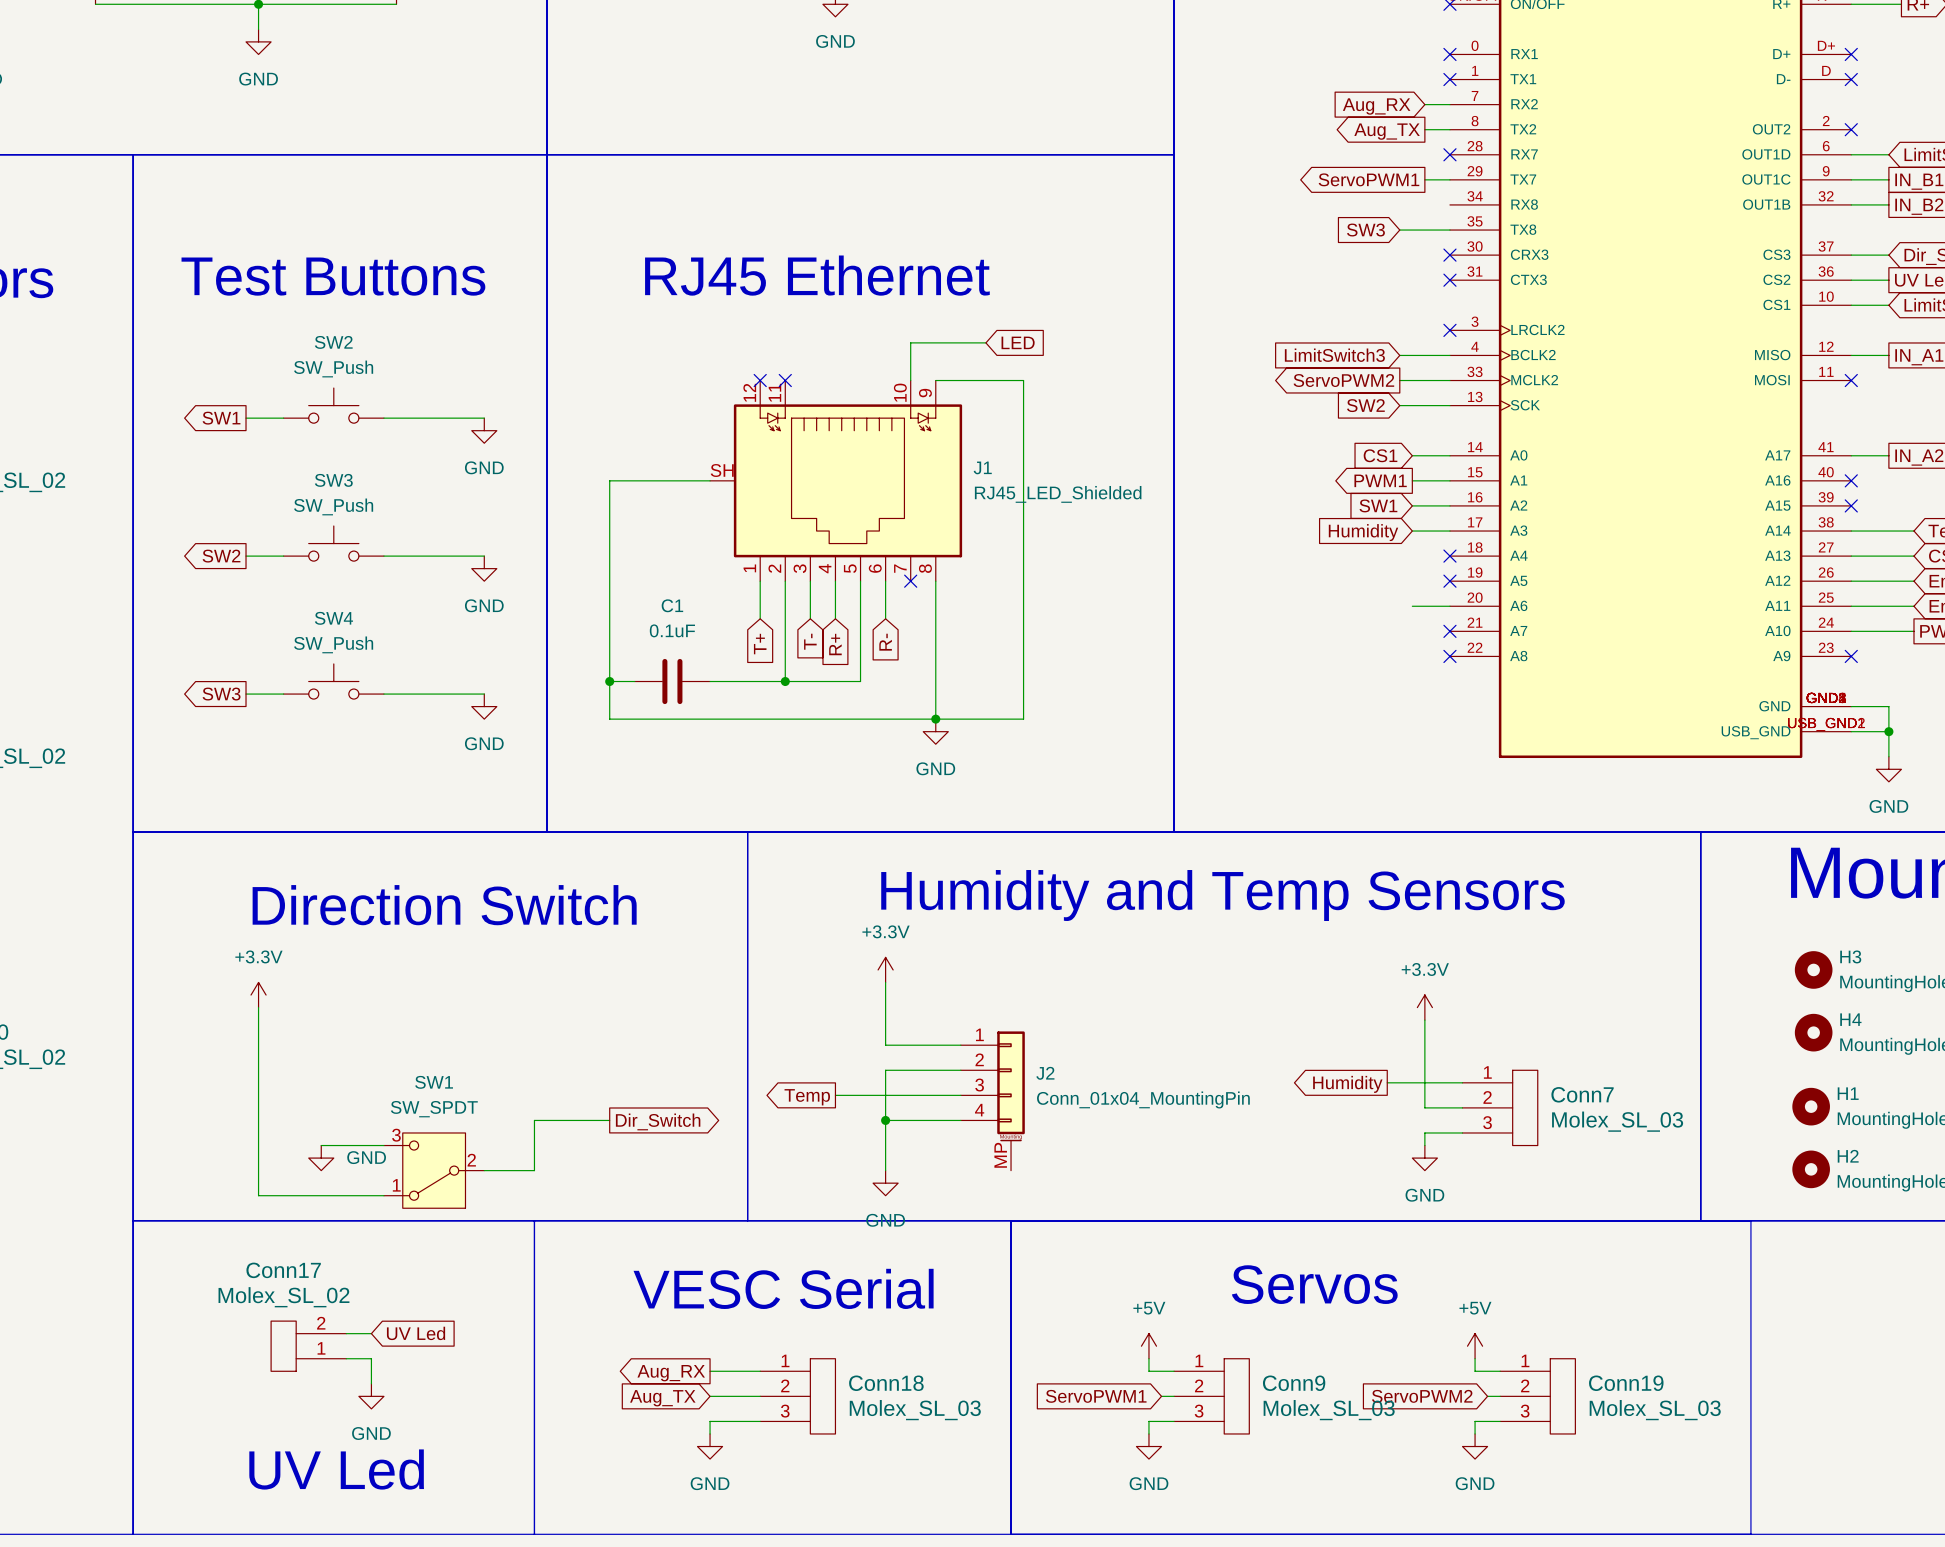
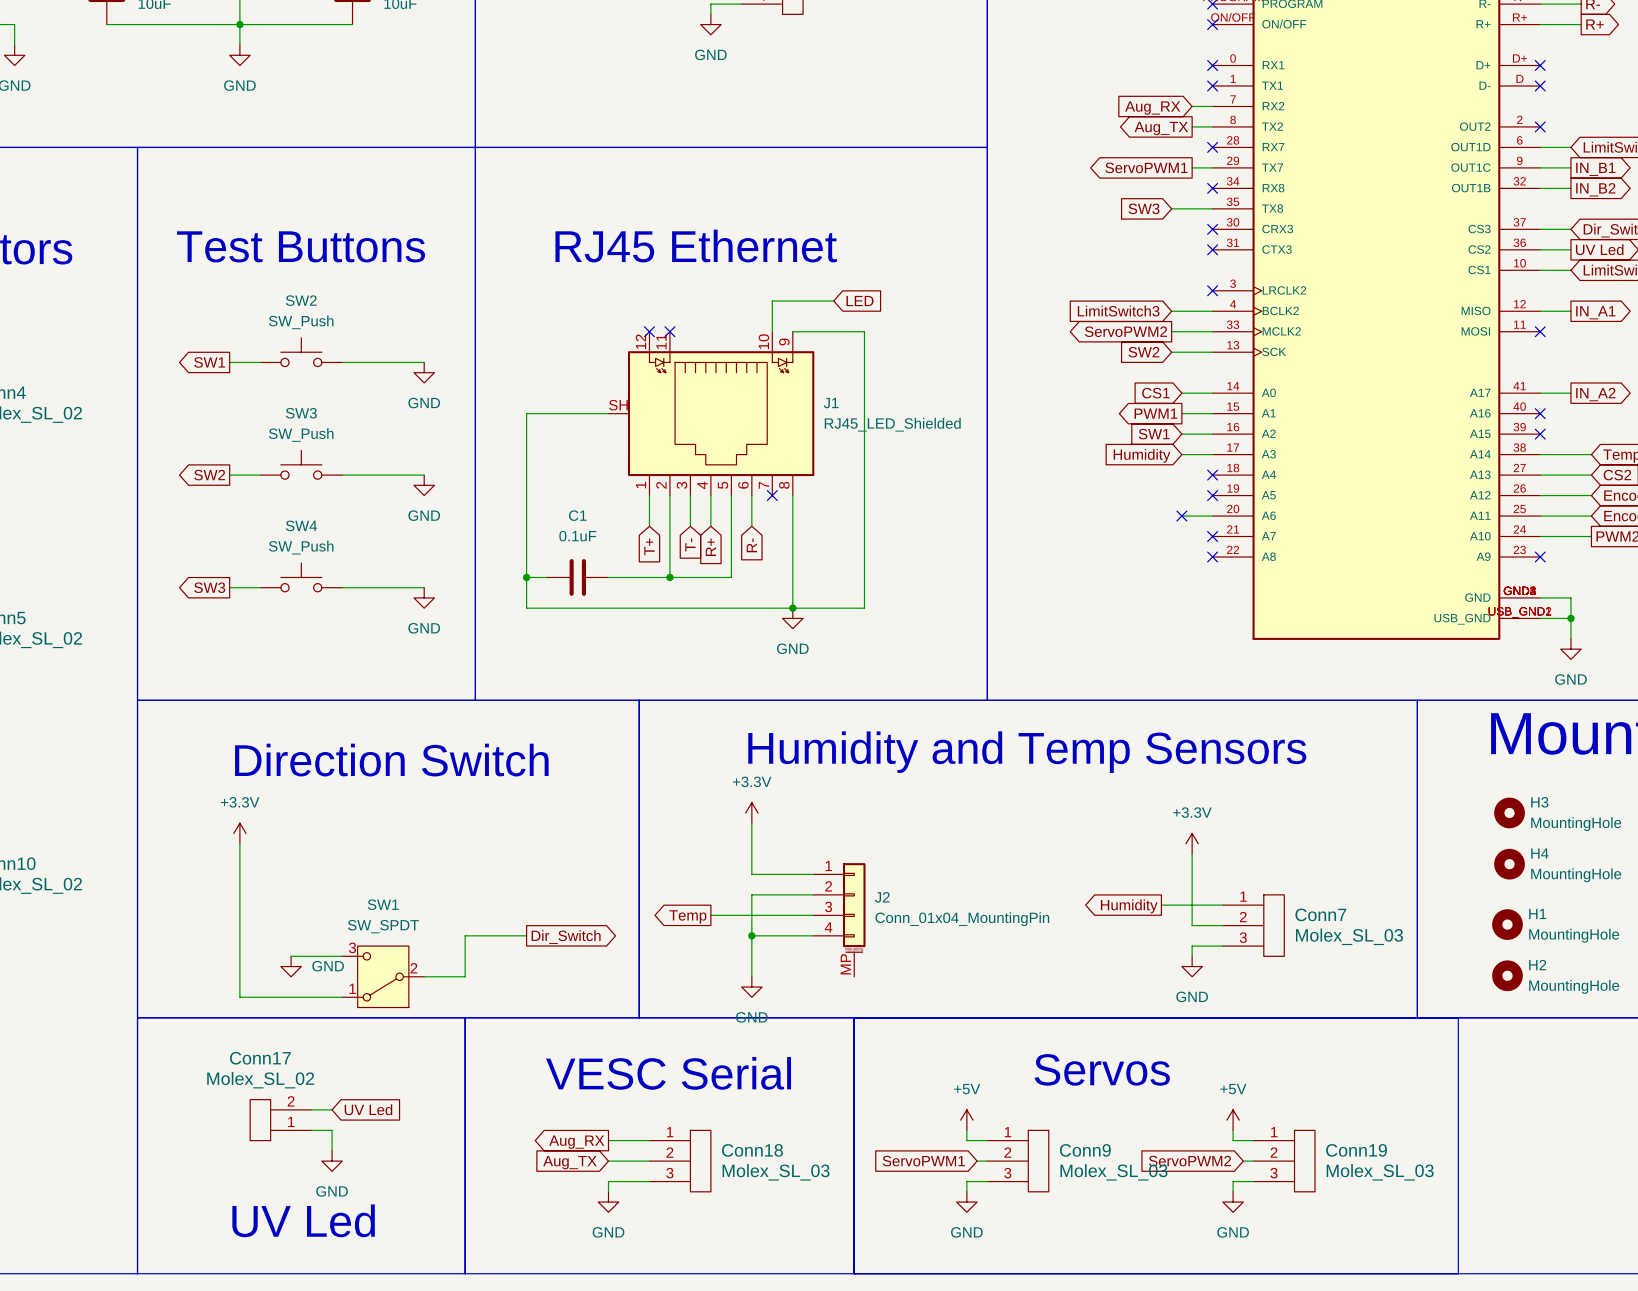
no-connect mark: none -> (1212, 188)
no-connect mark: none -> (1181, 516)

